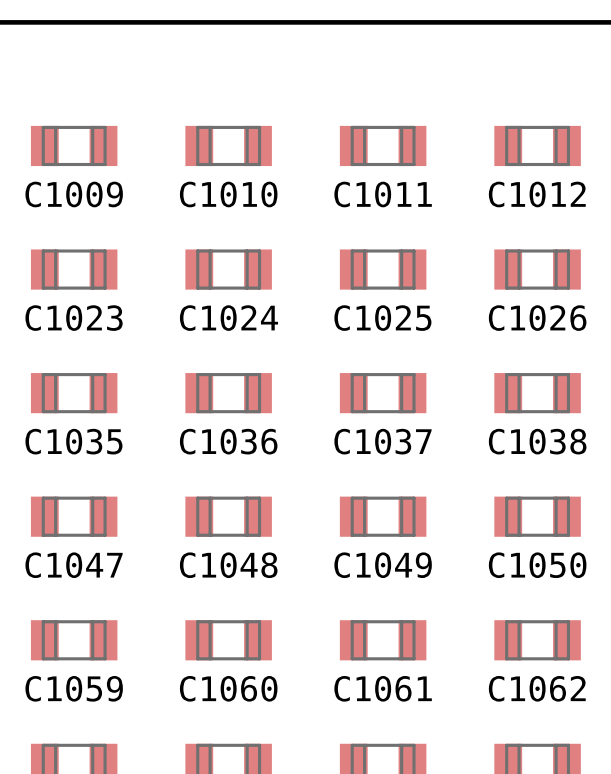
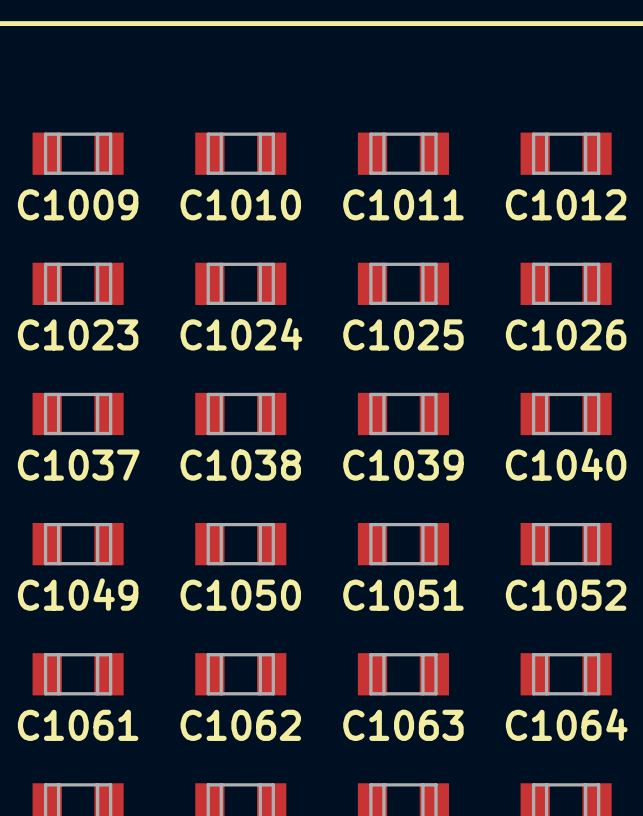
C1035 name: C1035 (73, 441) -> C1037 (78, 465)
C1036 name: C1036 (228, 441) -> C1038 (240, 465)
C1037 name: C1037 (382, 441) -> C1039 (403, 465)
C1038 name: C1038 (537, 441) -> C1040 (566, 464)
C1047 name: C1047 (74, 565) -> C1049 (78, 594)
C1048 name: C1048 (228, 565) -> C1050 (240, 595)
C1049 name: C1049 (383, 565) -> C1051 (403, 595)
C1050 name: C1050 (537, 565) -> C1052 (566, 595)
C1059 name: C1059 (74, 688) -> C1061 (78, 725)
C1060 name: C1060 (228, 688) -> C1062 (240, 725)
C1061 name: C1061 (383, 688) -> C1063 (403, 725)
C1062 name: C1062 (537, 688) -> C1064 (566, 724)

